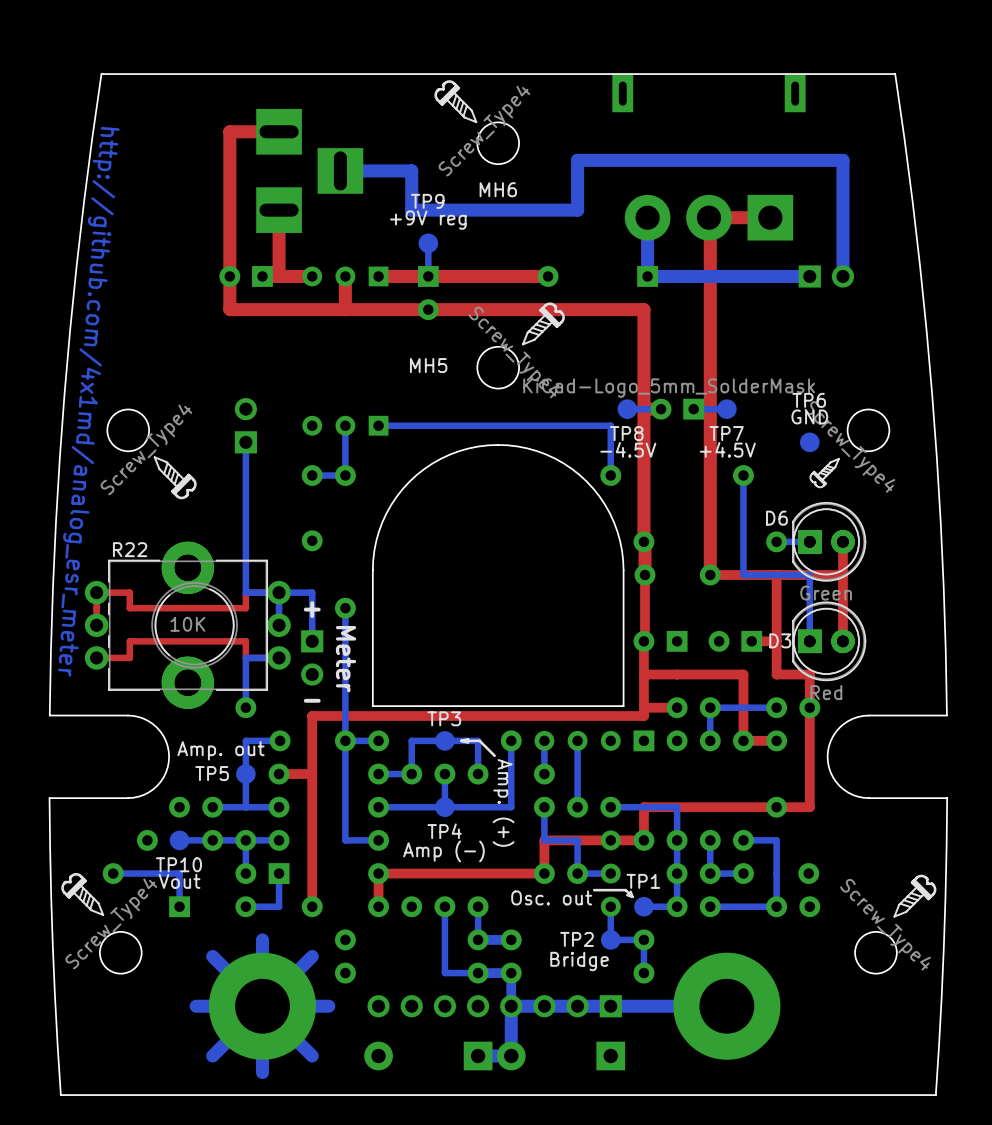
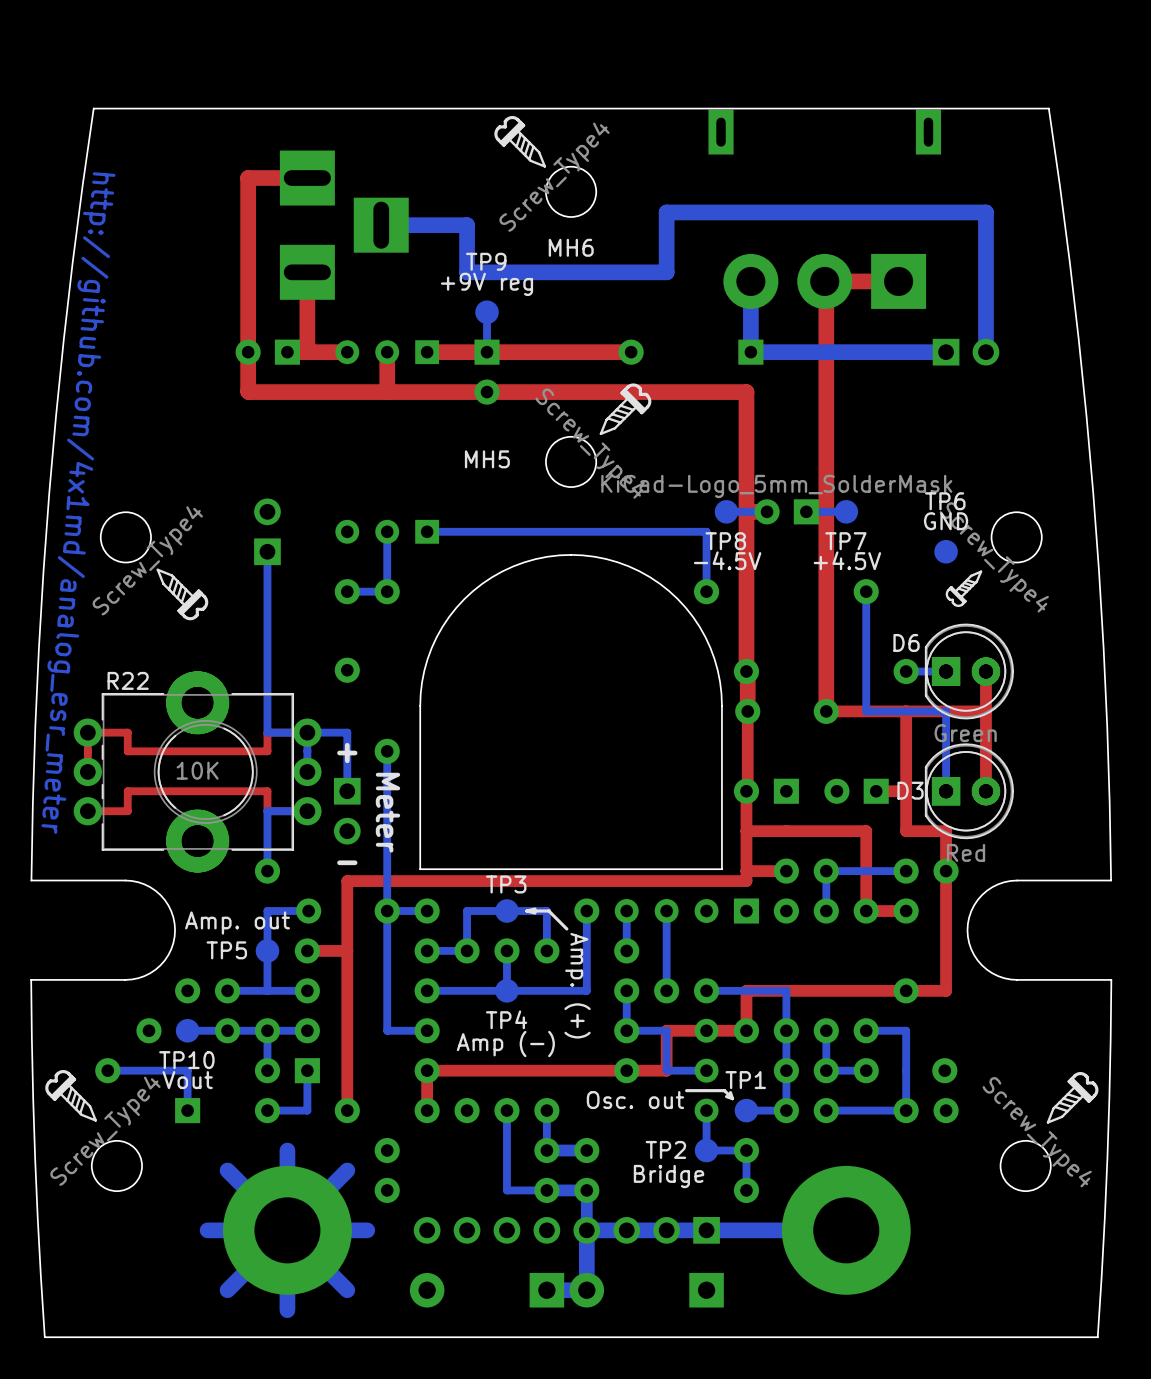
top track: (577, 840) (544, 840) (544, 873) -> (666, 1030) (666, 1070) (626, 1070)
part rotation: 0° (561, 873) -> 90° clockwise (626, 1050)

